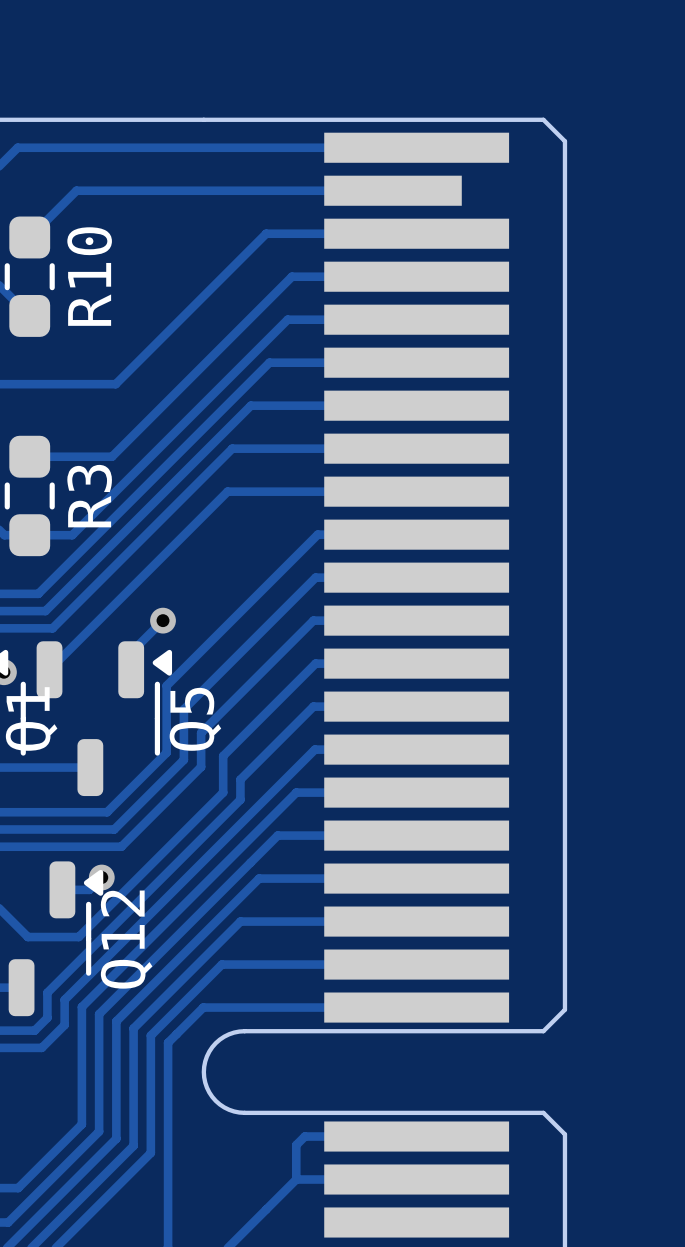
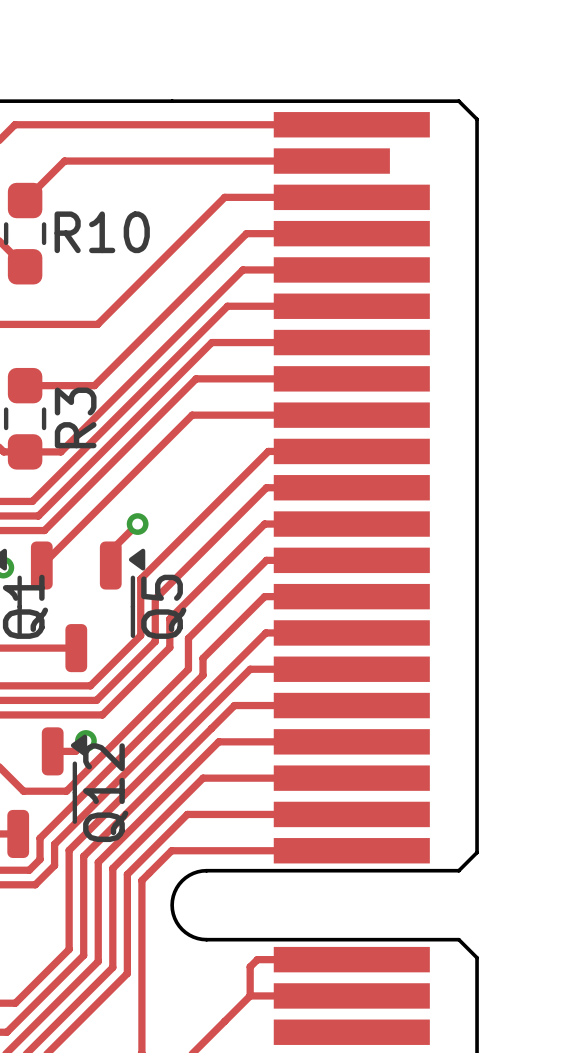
R10 name rotation: 0° (89, 276) -> 90° clockwise (102, 232)

